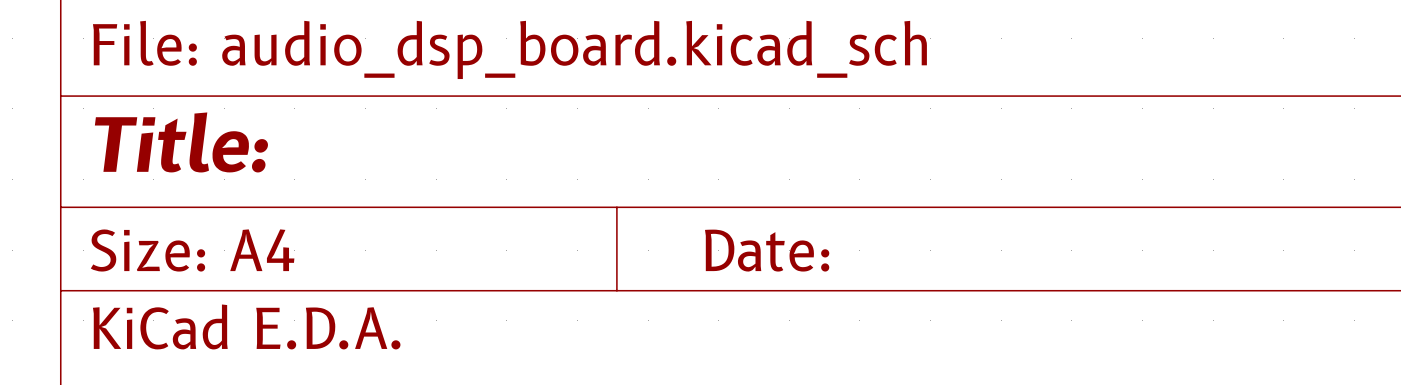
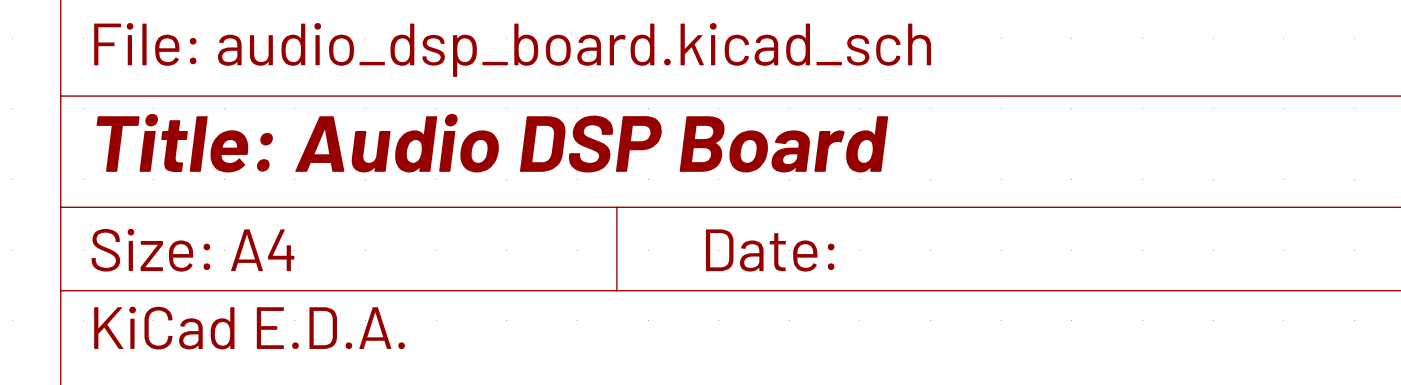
title block: Title: (181, 142) -> Title: Audio DSP Board (492, 143)

